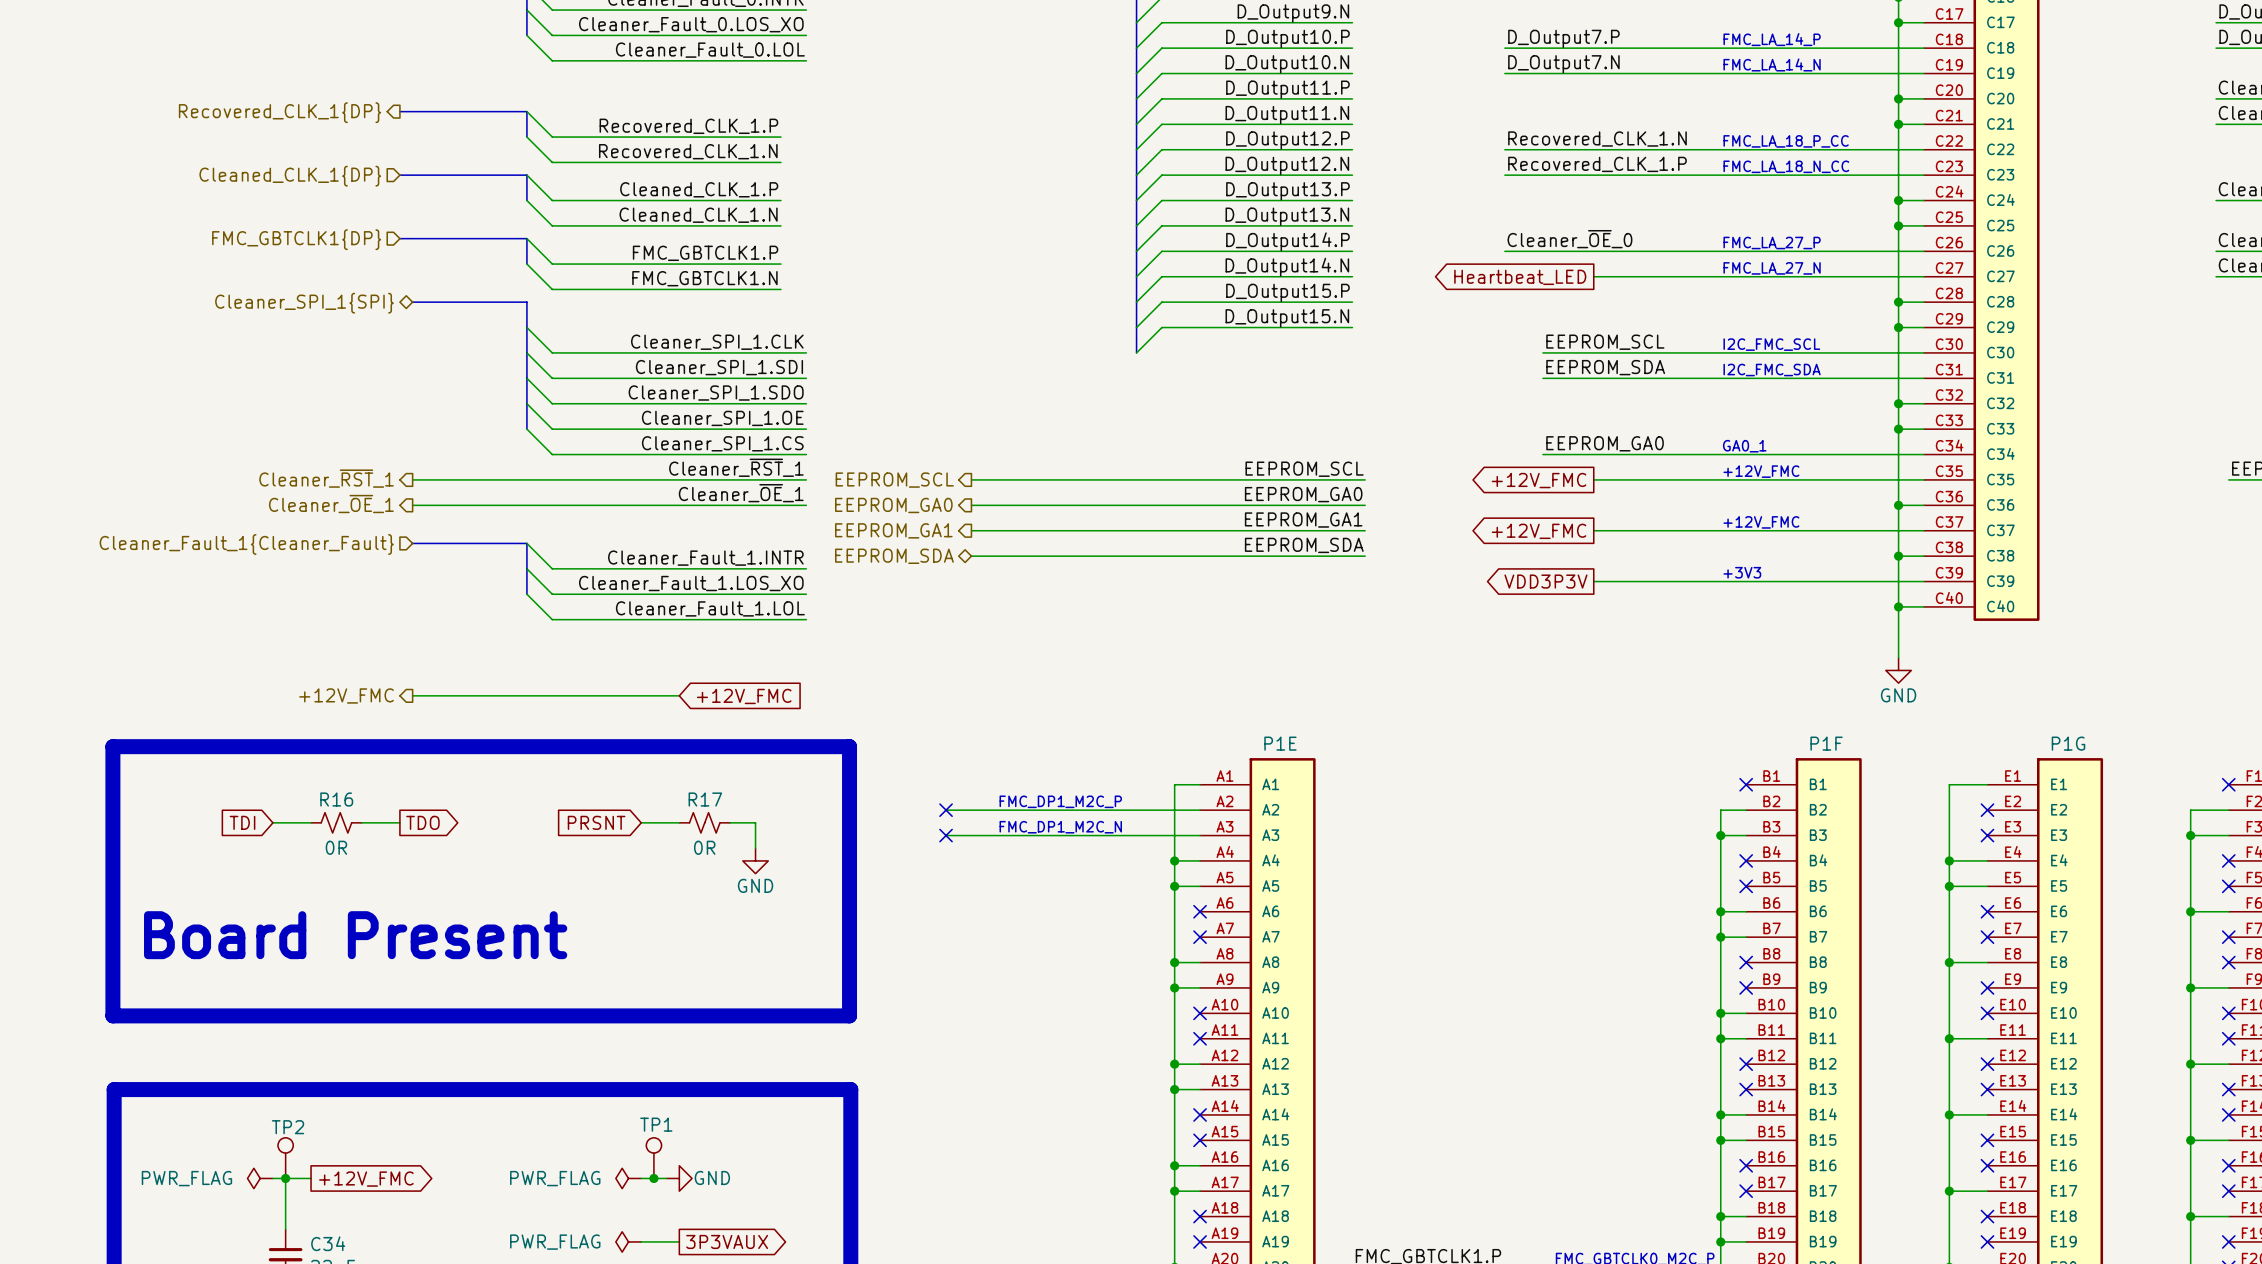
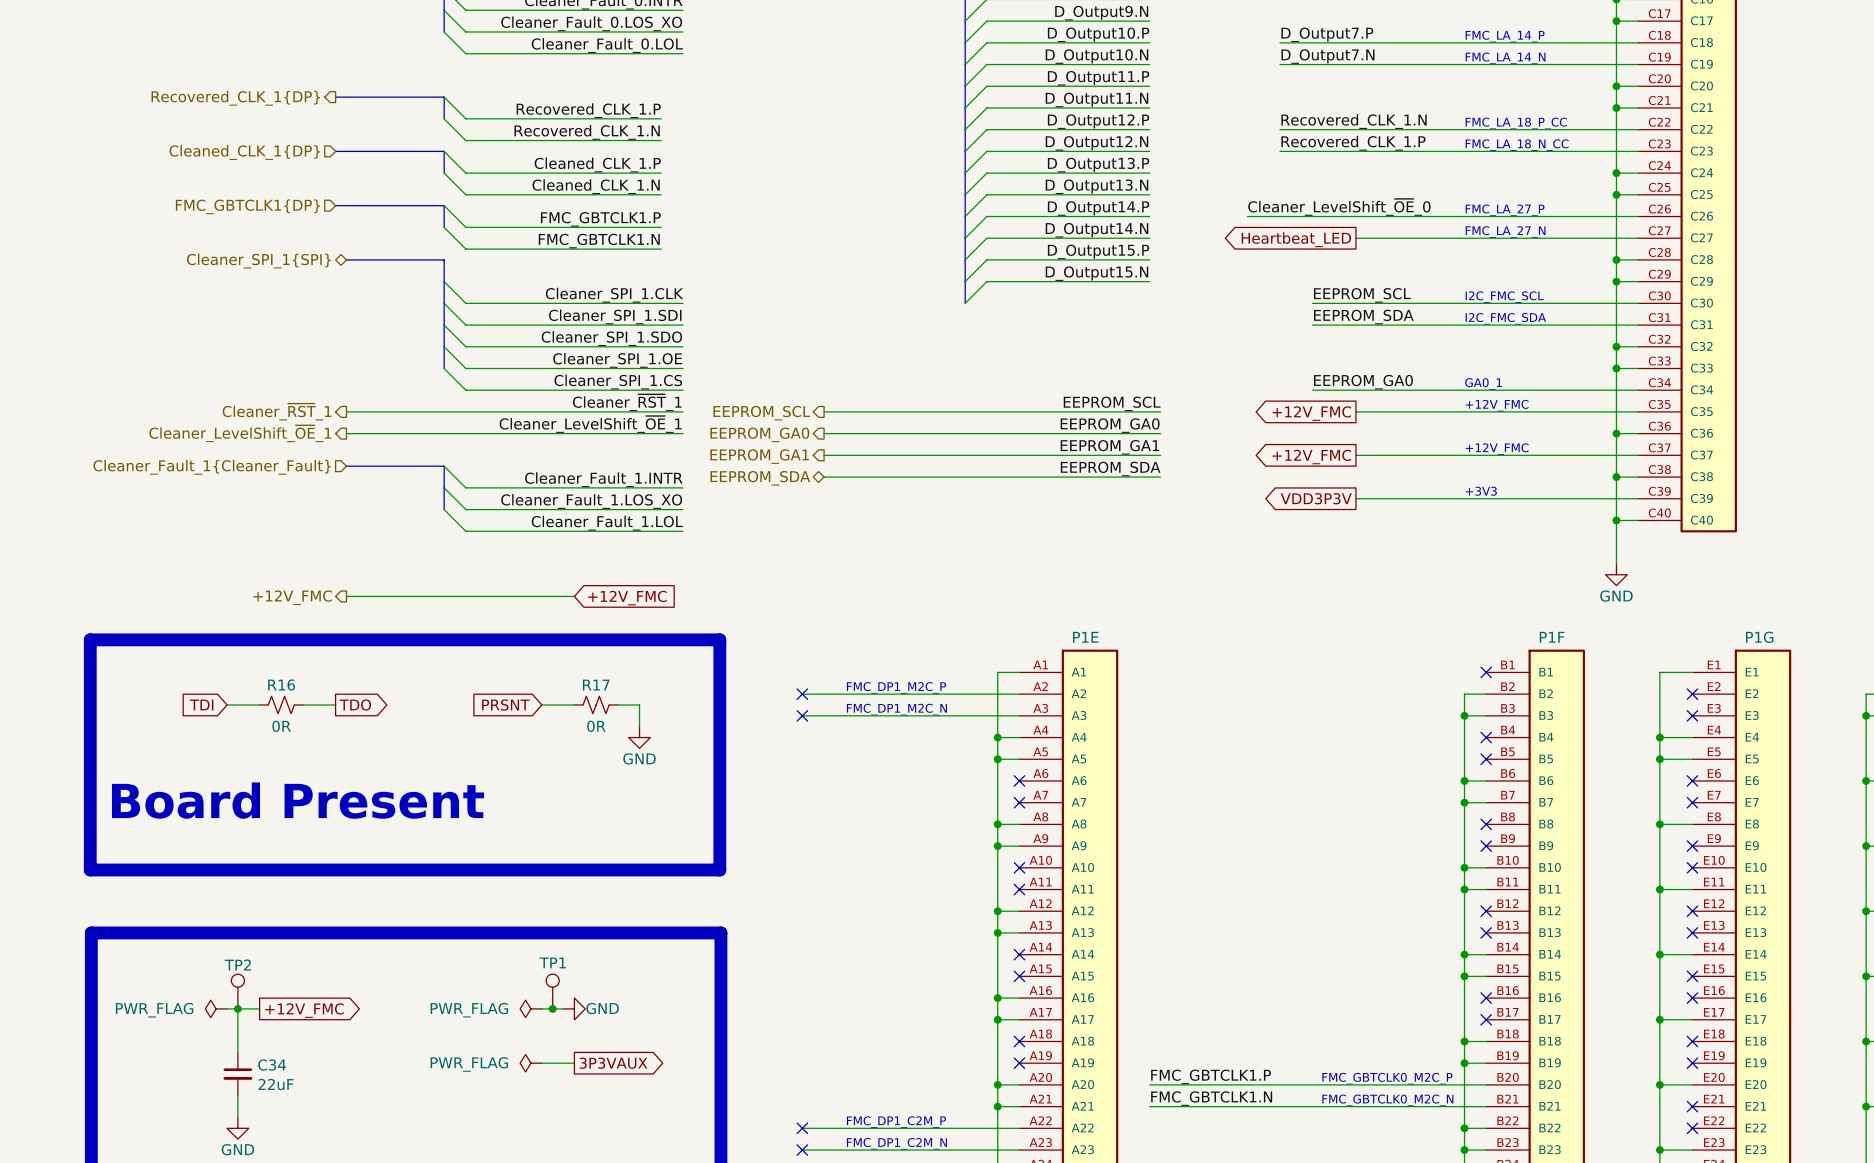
label: Cleaner_~{OE}_0 (1569, 239) -> Cleaner_LevelShift_~{OE}_0 (1339, 207)
wire: none -> (1247, 216) (1279, 216)
label: Cleaner_~{OE}_1 (741, 493) -> Cleaner_LevelShift_~{OE}_1 (590, 424)
hierarchical label: Cleaner_~{OE}_1 (331, 504) -> Cleaner_LevelShift_~{OE}_1 (240, 433)

